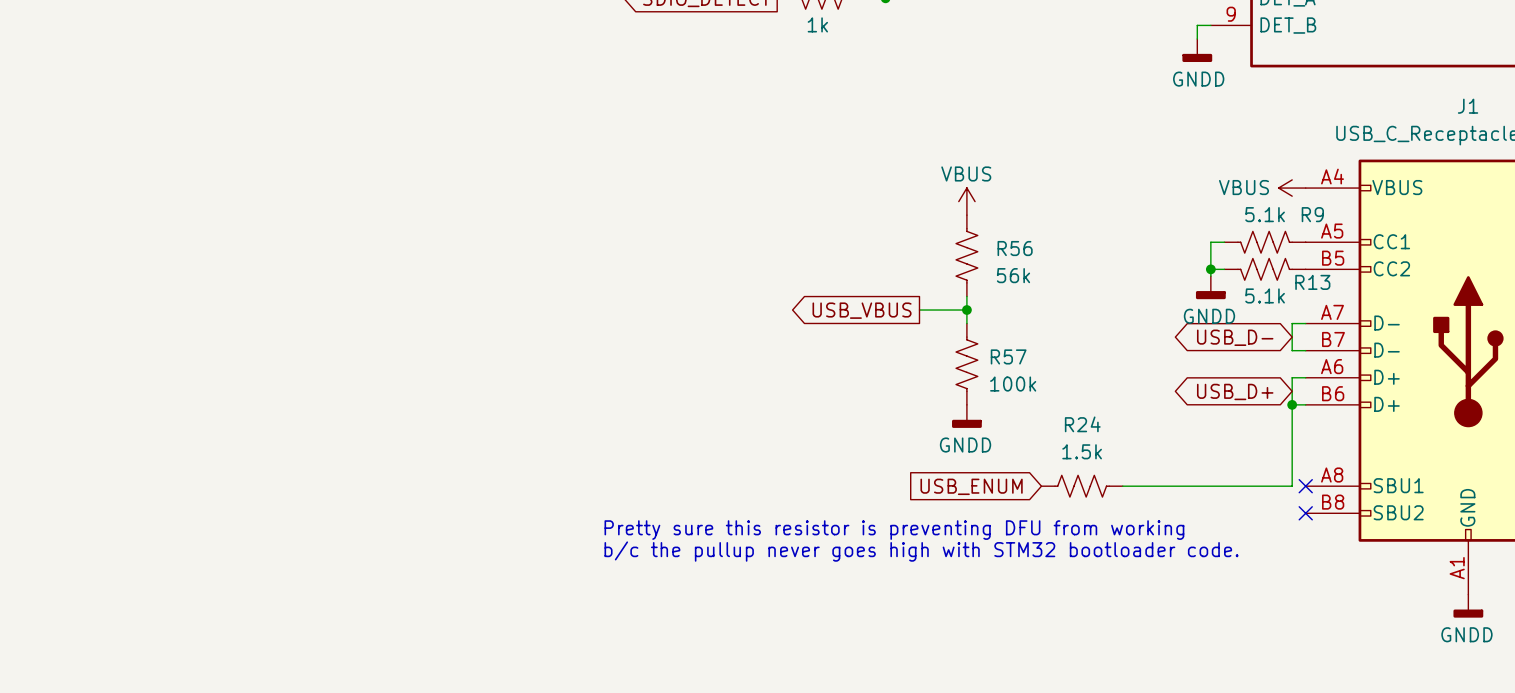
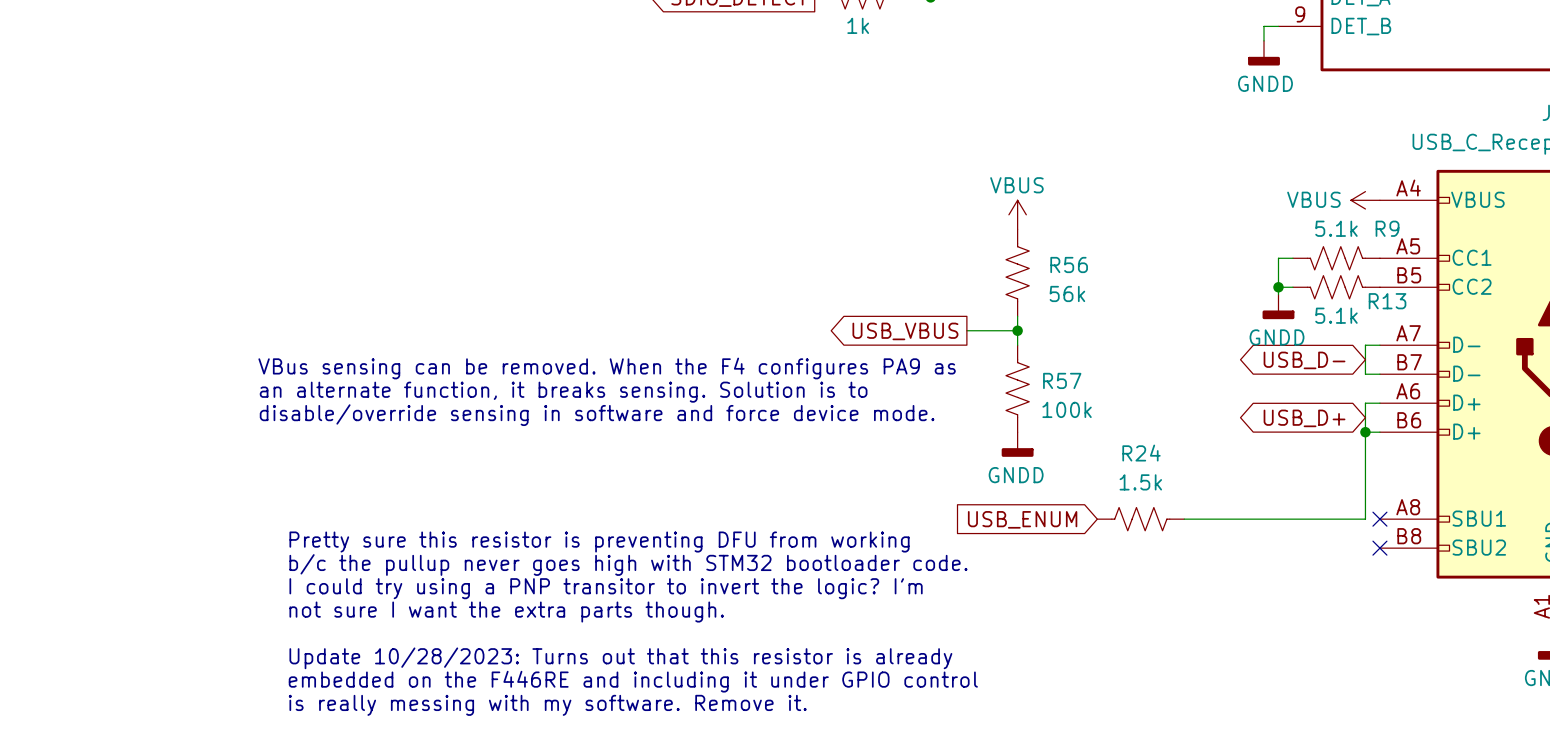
text: none -> VBus sensing can be removed. When the F4 configures PA9 as (607, 368)
text: none -> an alternate function, it breaks sensing. Solution is to (563, 392)
text: none -> disable/override sensing in software and force device mode. (597, 415)
text: none -> Pretty sure this resistor is preventing DFU from working (599, 542)
text: none -> b/c the pullup never goes high with STM32 bootloader code. (628, 565)
text: Pretty sure this resistor is preventing DFU from working (894, 530) -> none
text: none -> I could try using a PNP transitor to invert the logic? I'm (606, 588)
text: b/c the pullup never goes high with STM32 bootloader code. (921, 551) -> none
text: none -> not sure I want the extra parts though. (506, 612)
text: none -> Update 10/28/2023: Turns out that this resistor is already (620, 658)
text: none -> embedded on the F446RE and including it under GPIO control (633, 681)
text: none -> is really messing with my software. Remove it. (547, 705)

